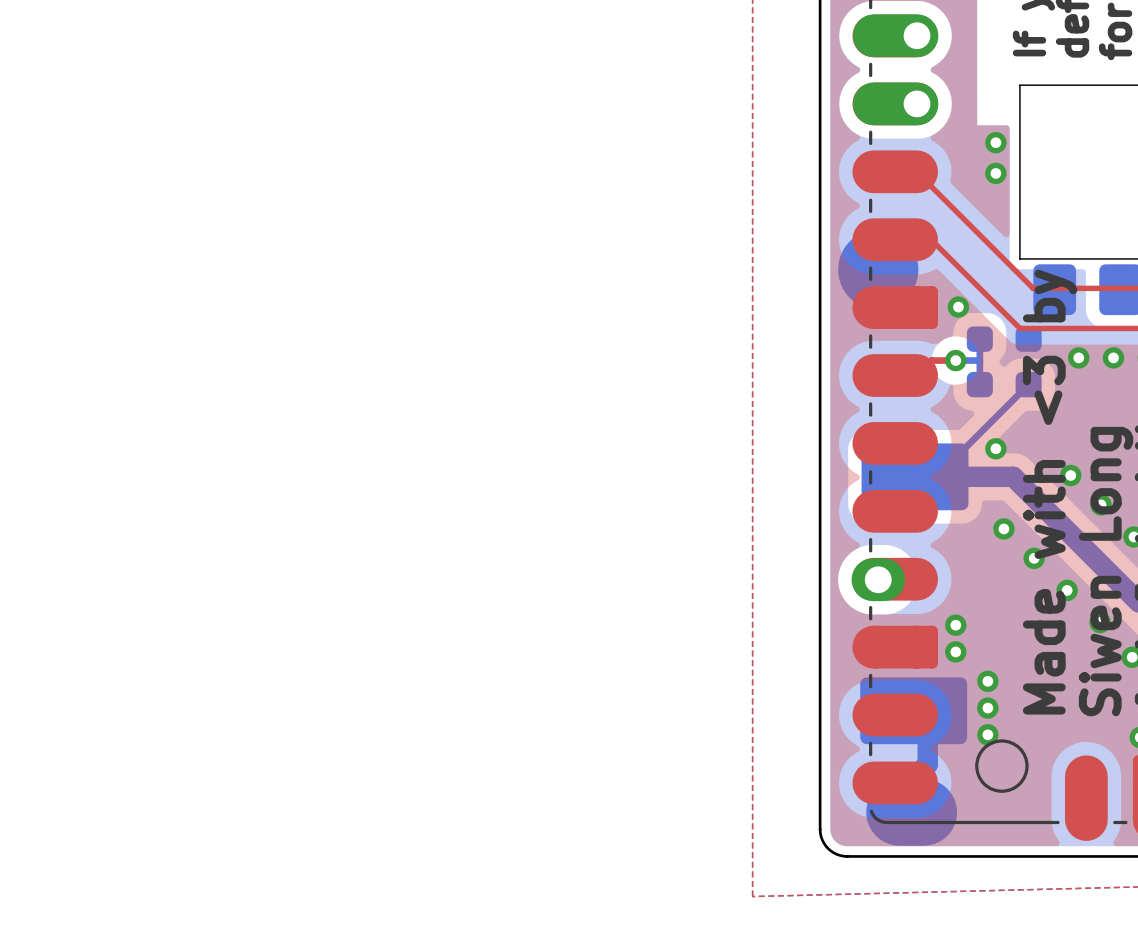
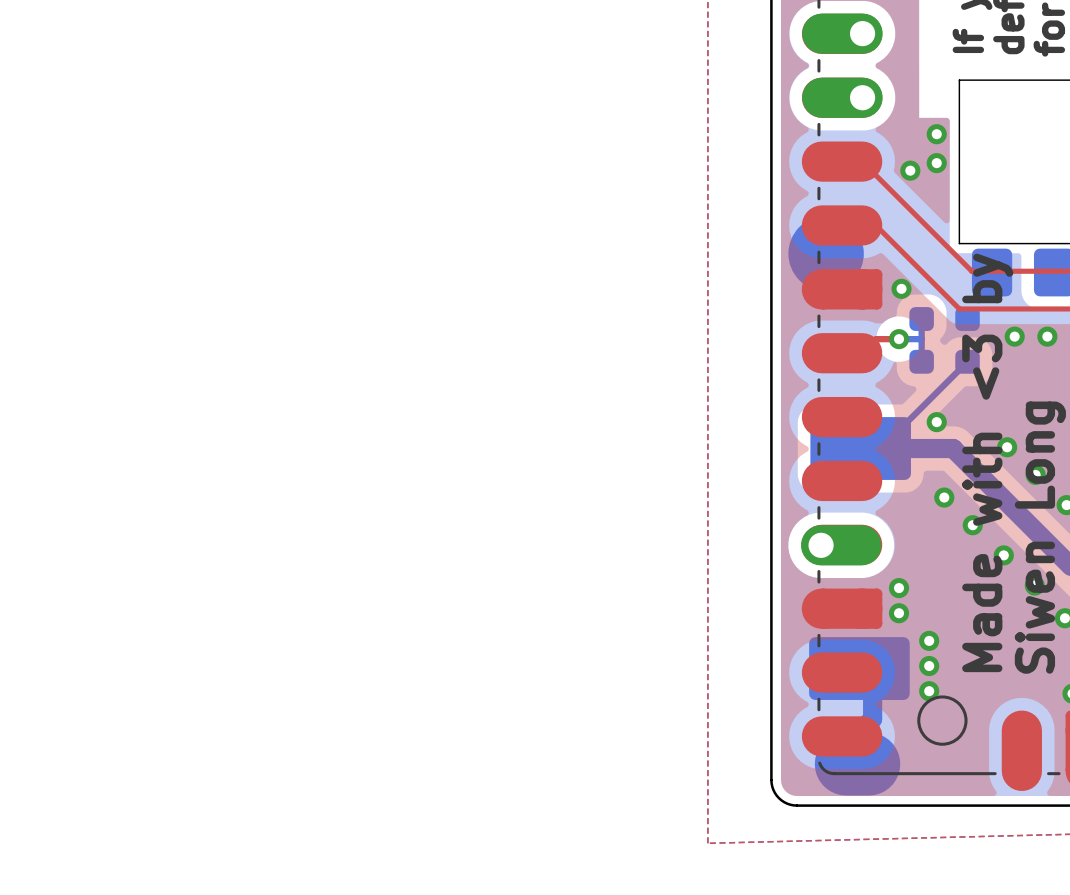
via: none -> (910, 170)
part footprint: [851, 558, 905, 602] -> [800, 525, 882, 566]

